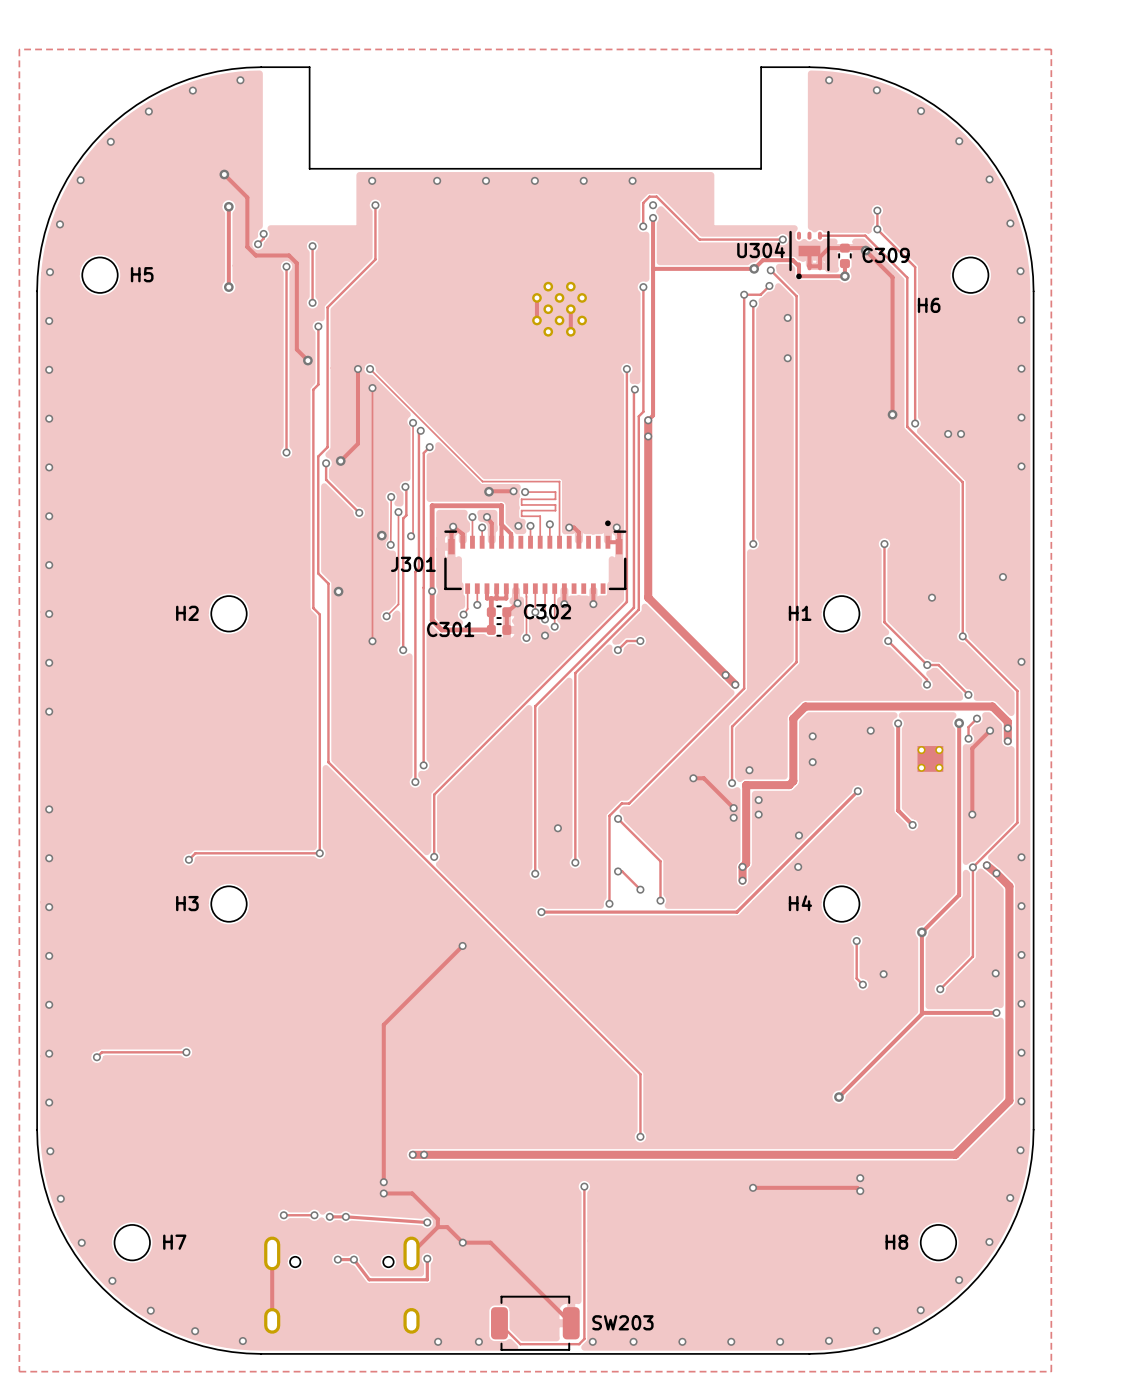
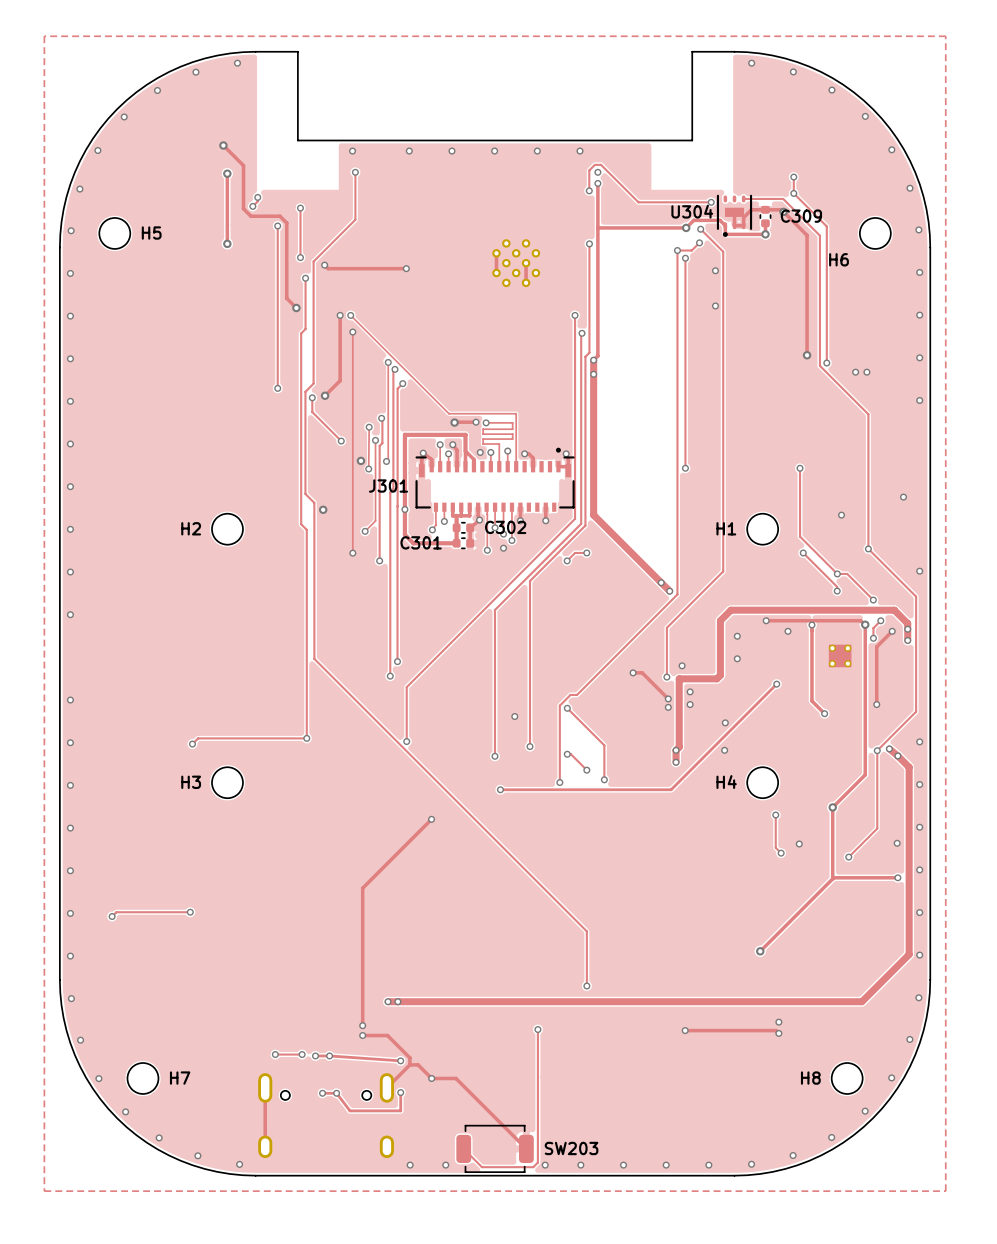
track: none -> (324, 265) (328, 268) (406, 268)
via: none -> (324, 265)
via: none -> (406, 268)
track: none -> (766, 620) (860, 620) (865, 624)
via: none -> (766, 620)

